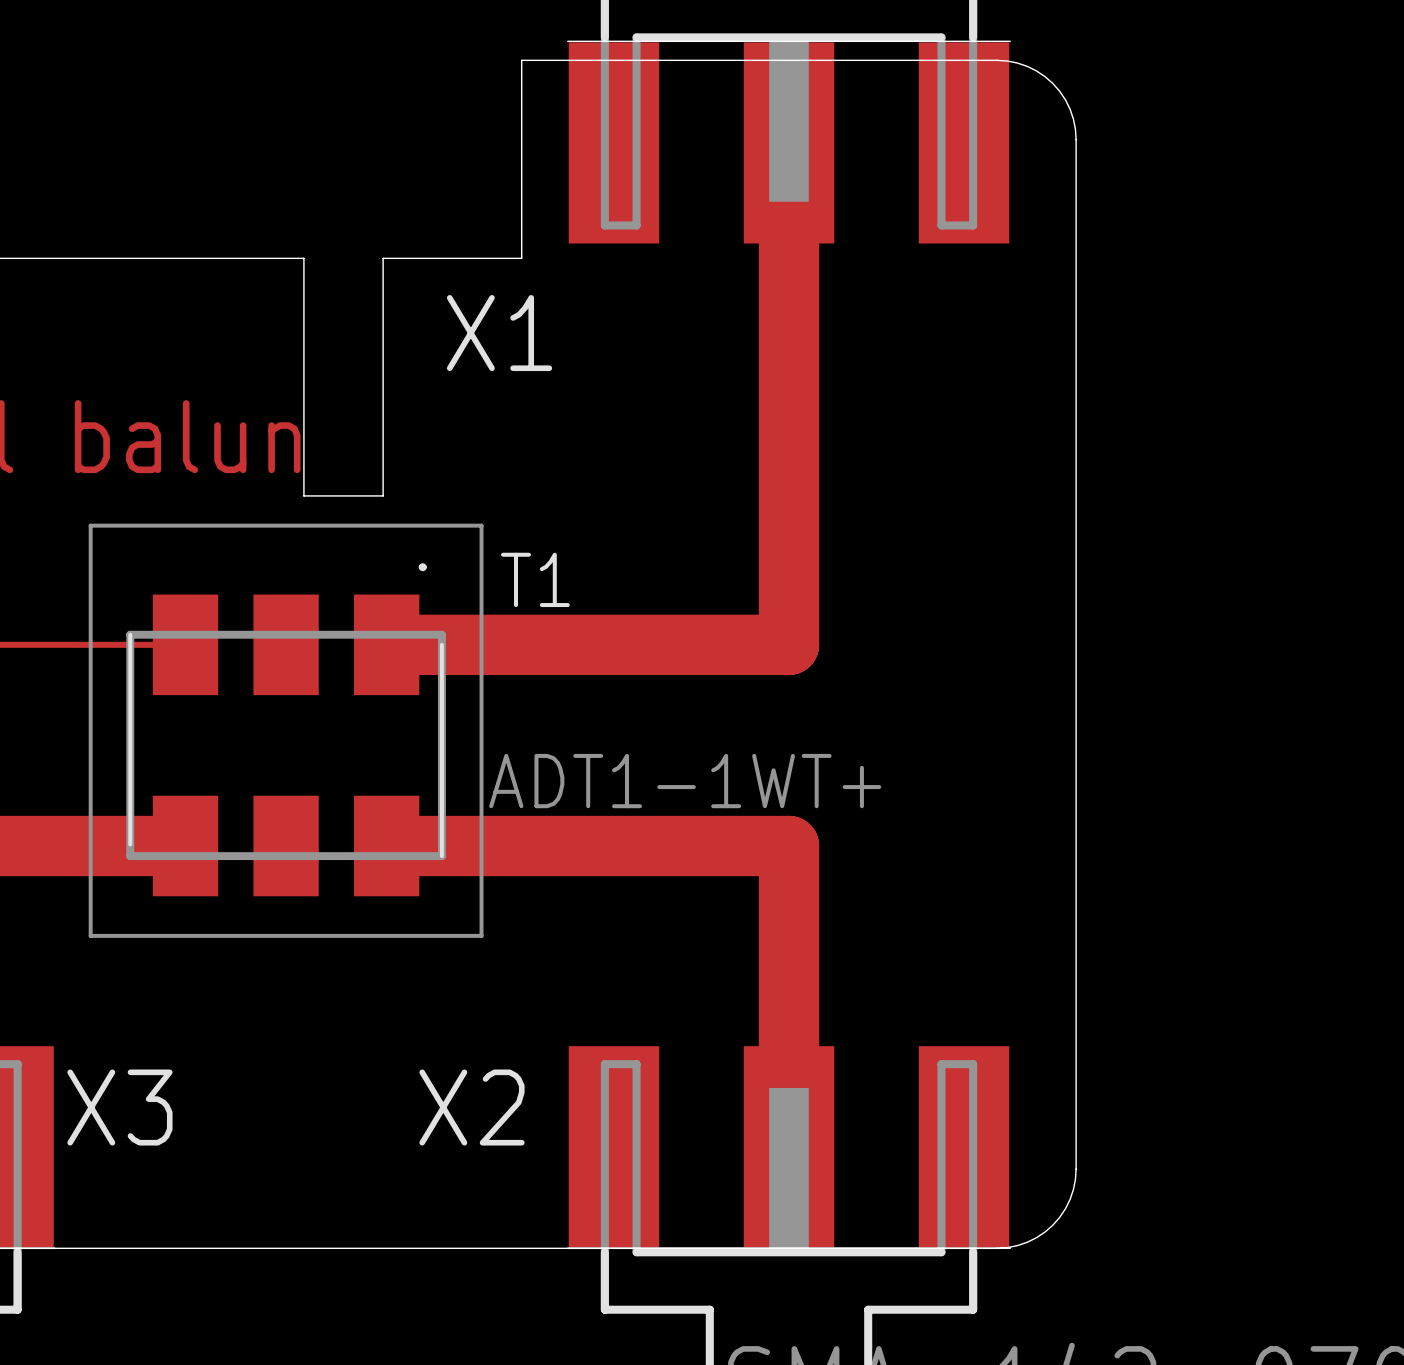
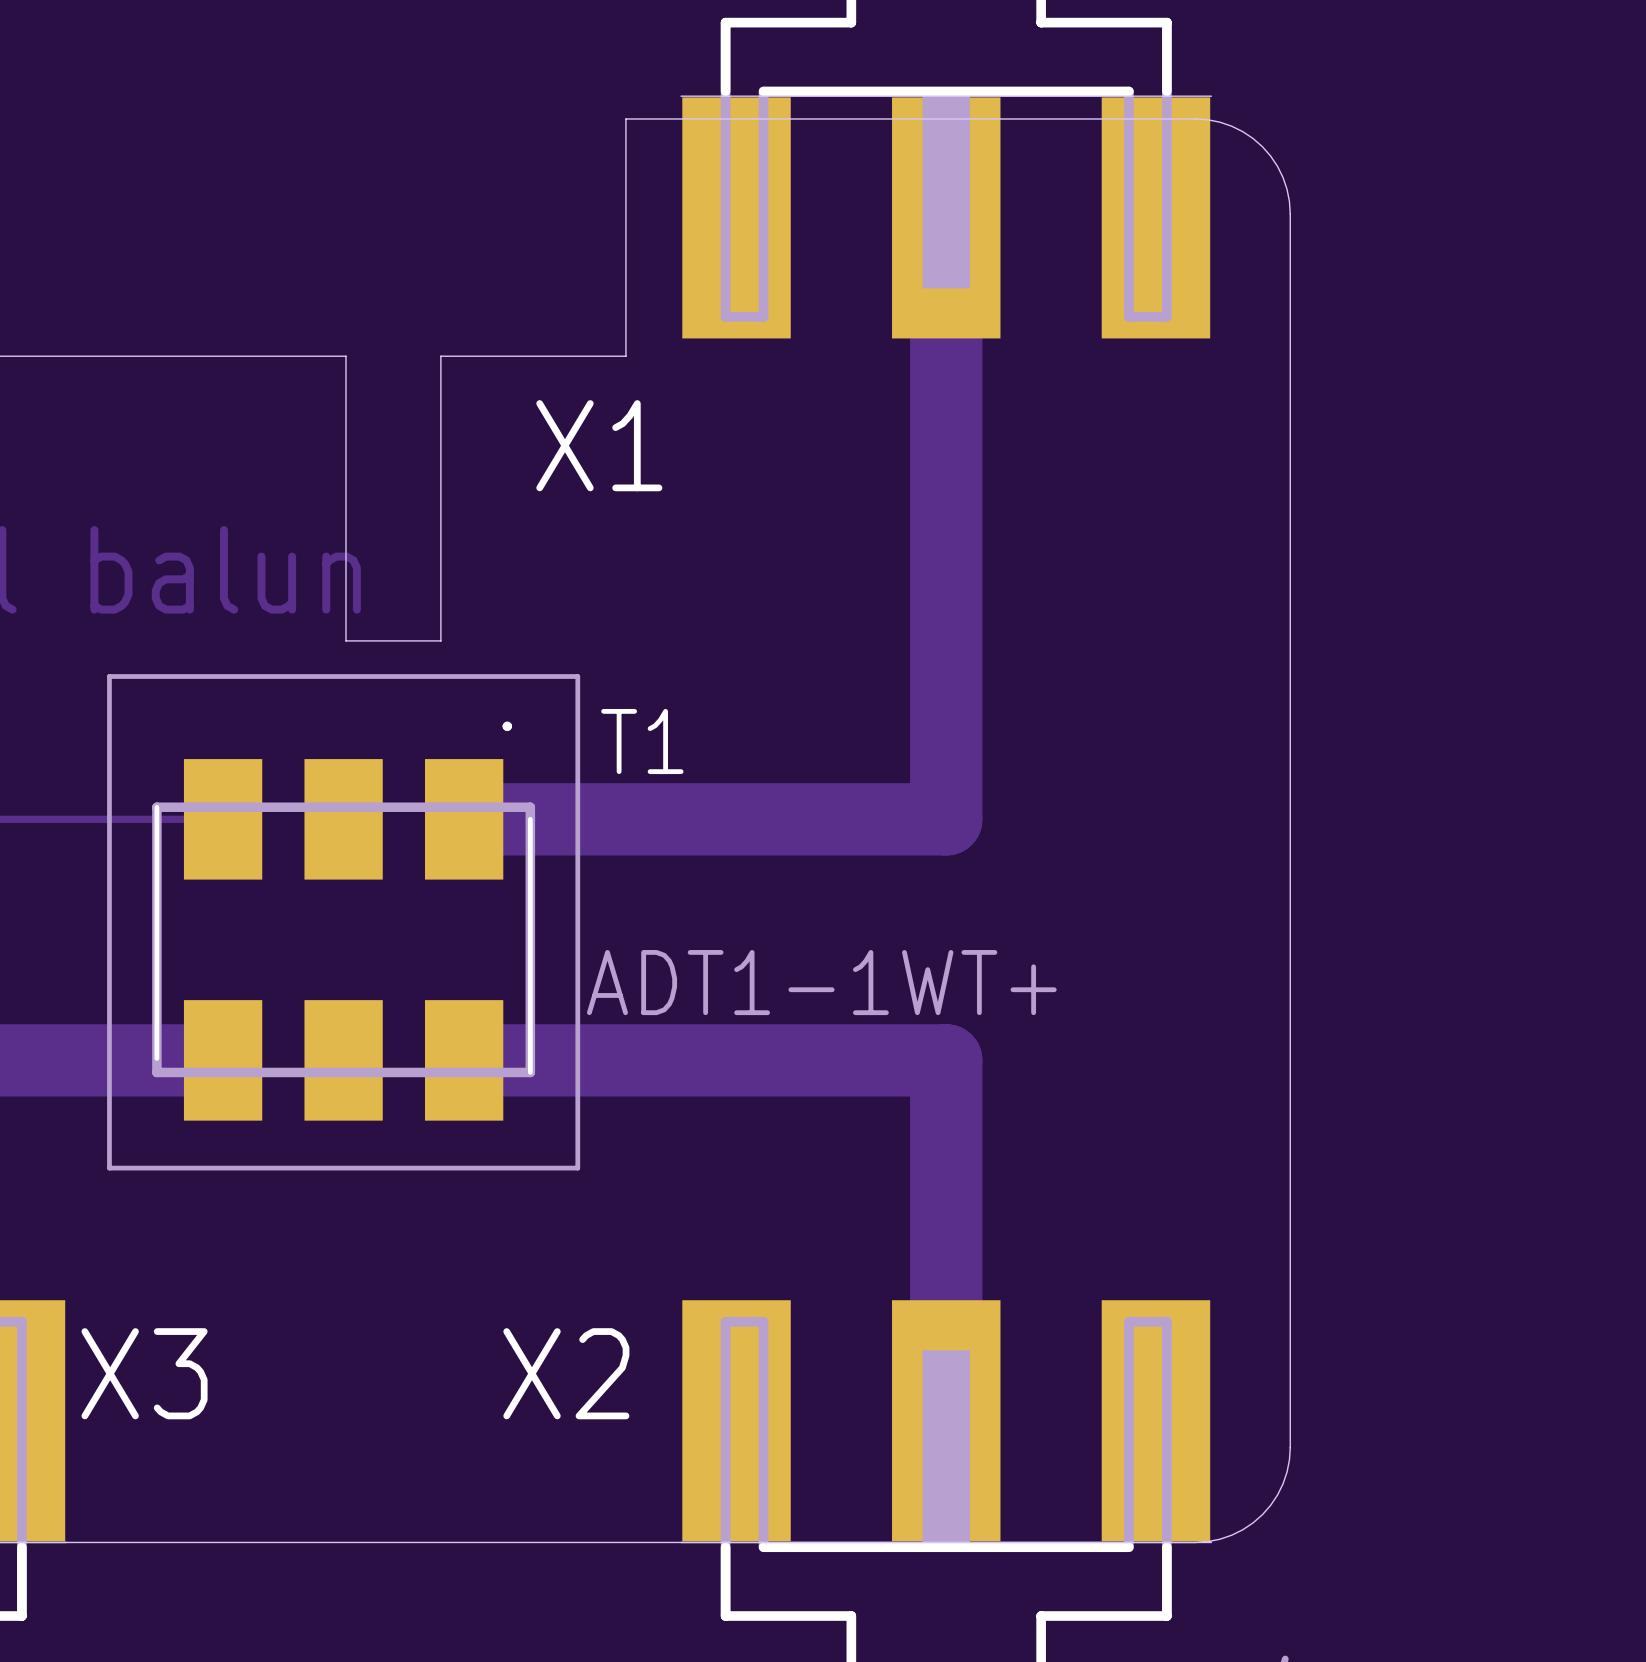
board edge: (288, 258) (303, 258) (303, 495) -> (345, 356) (345, 640) (364, 640)
board edge: (383, 258) (383, 495) (367, 495) -> (459, 356) (440, 356) (440, 640)

